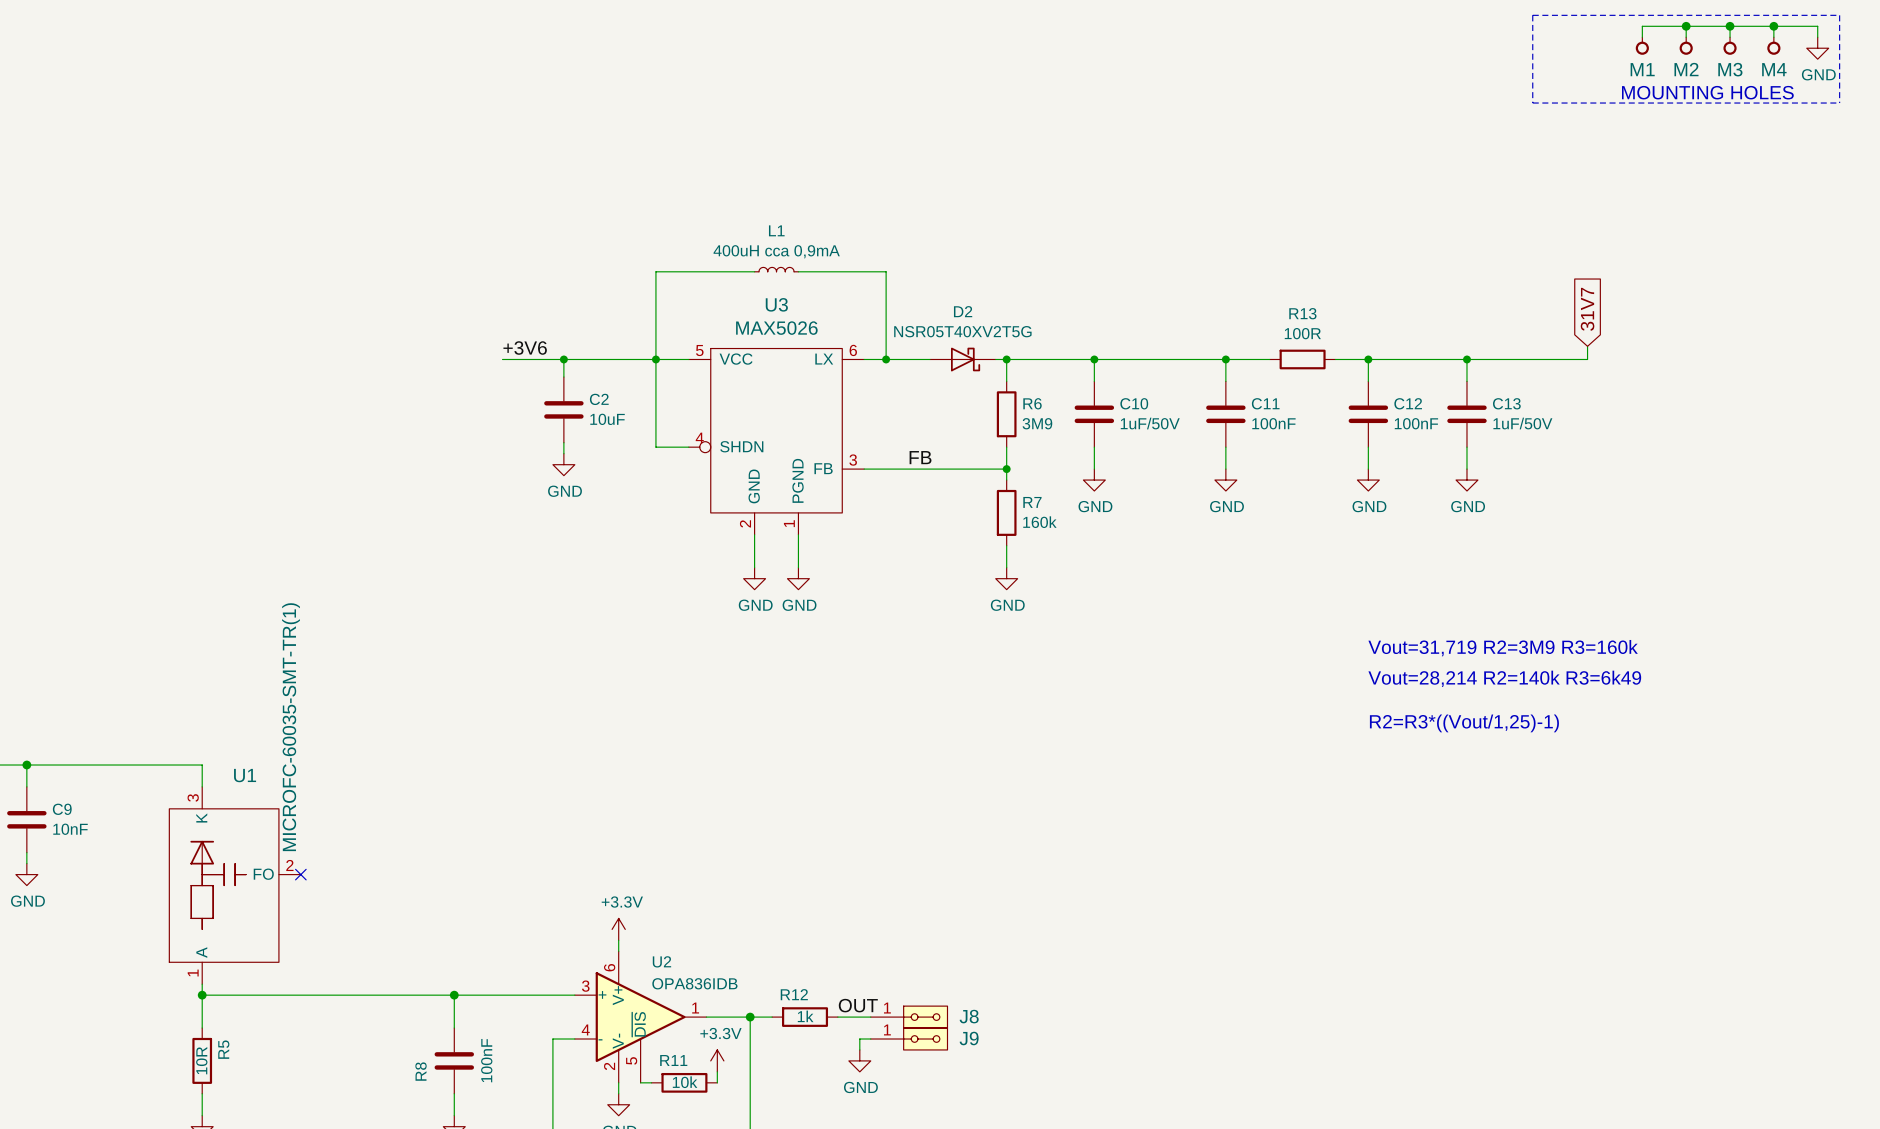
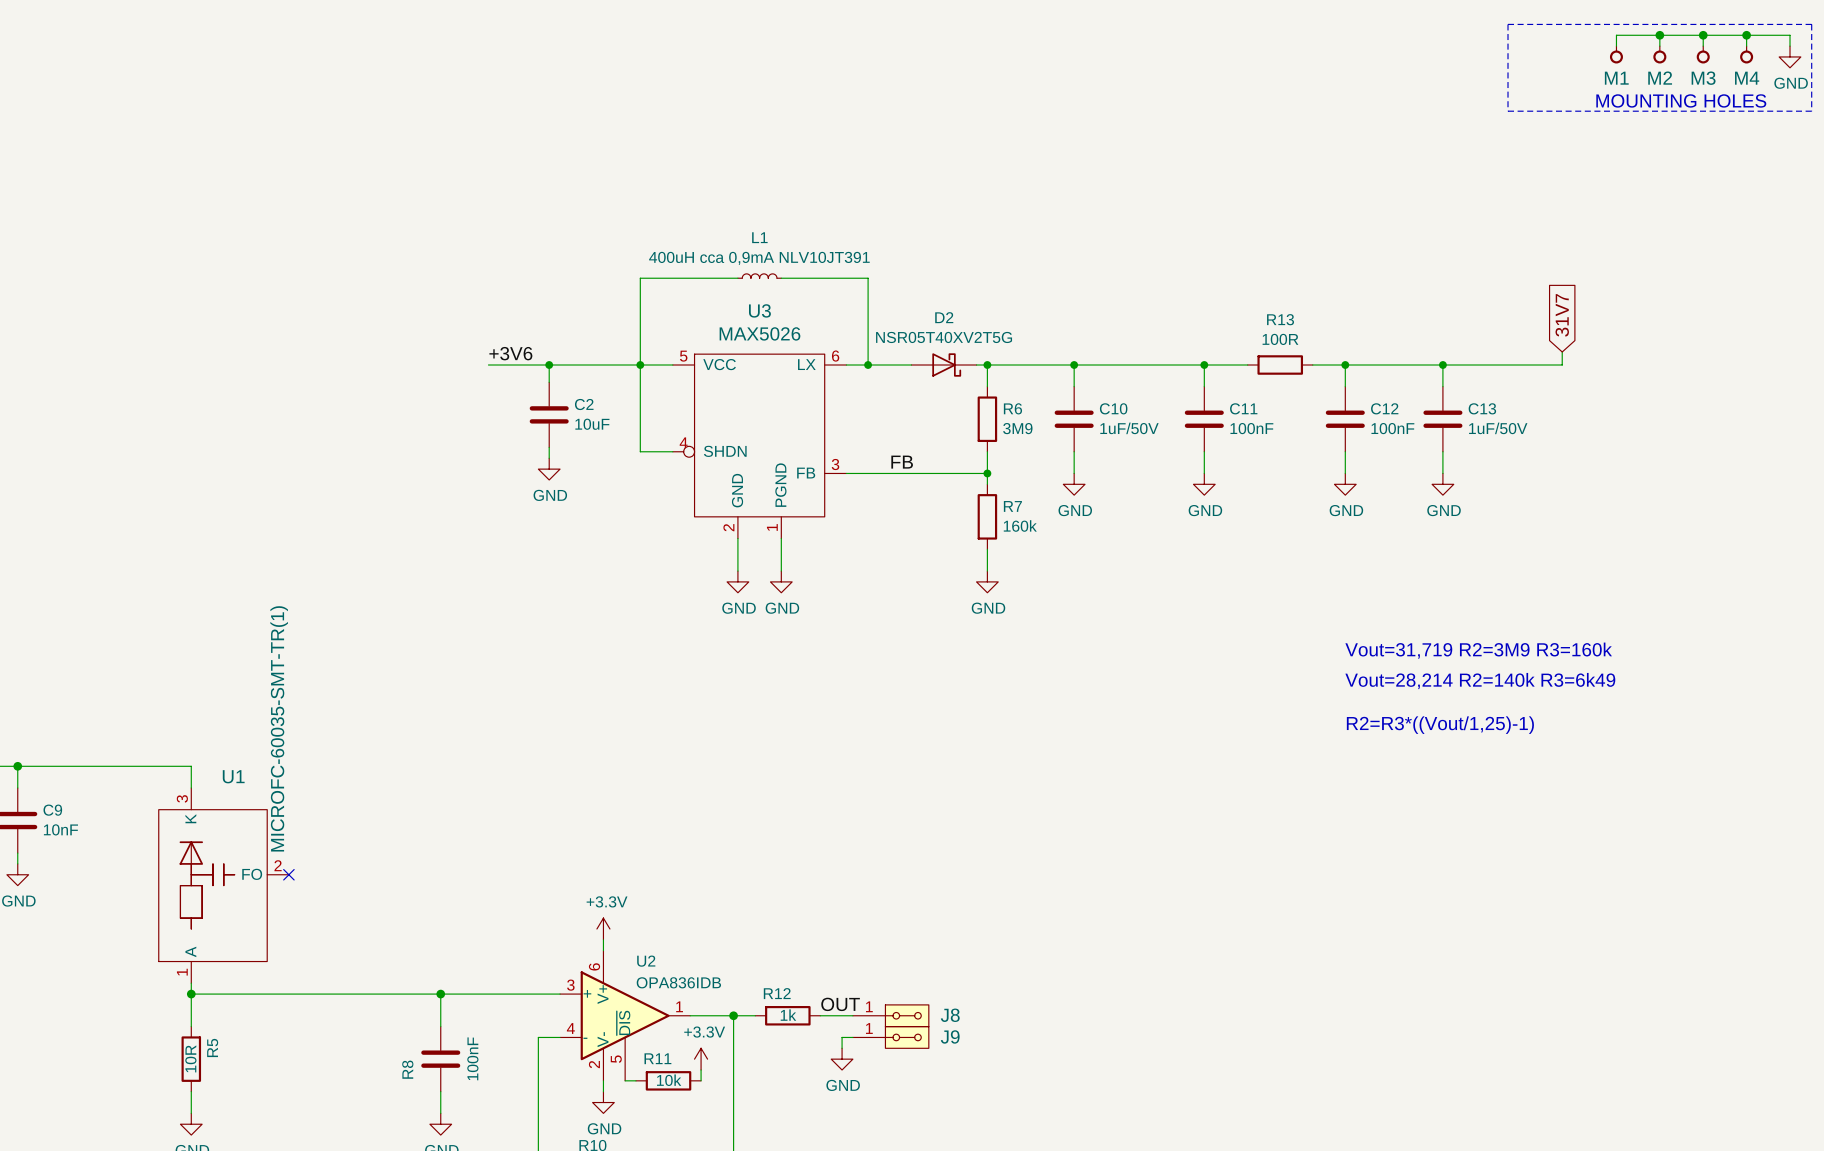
L1 value: 400uH cca 0,9mA (776, 251) -> 400uH cca 0,9mA NLV10JT391 (759, 258)

